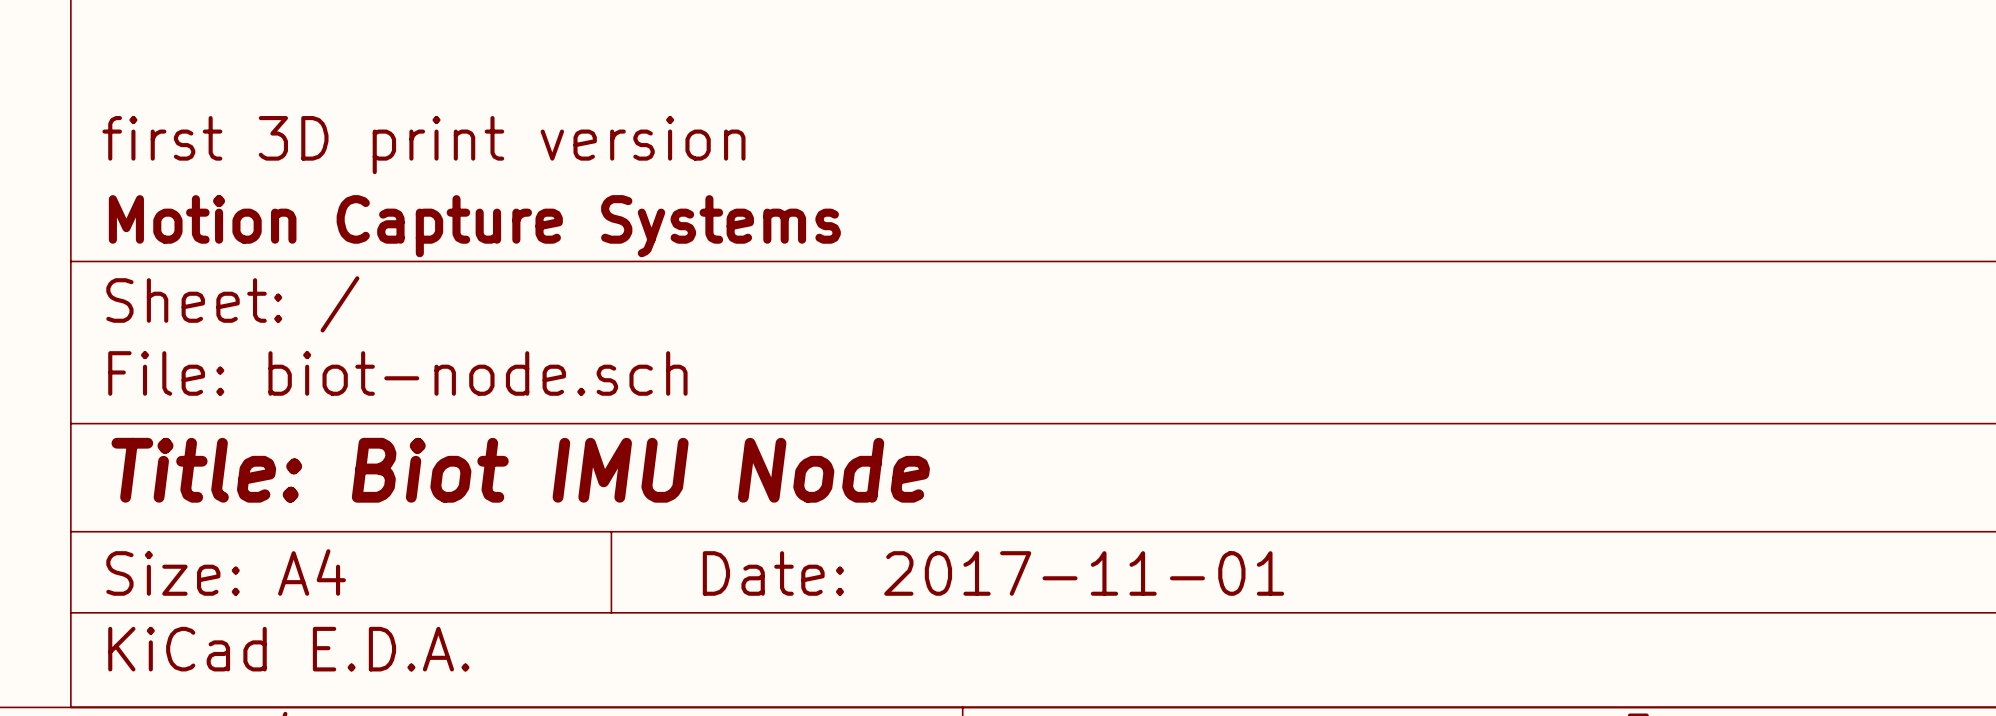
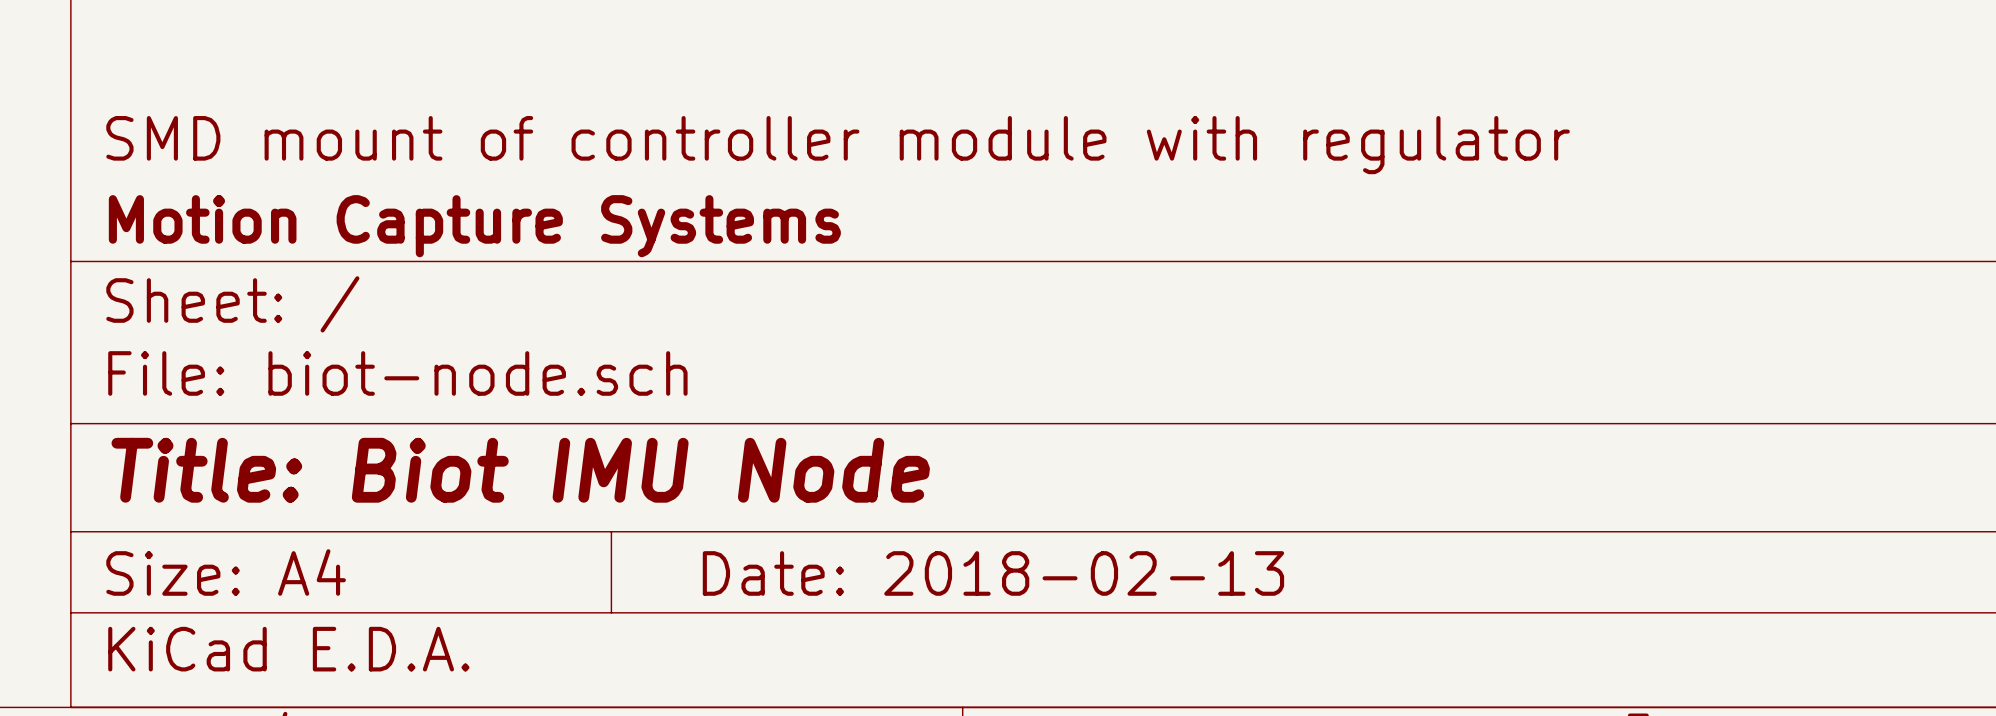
title block: first 3D print version (423, 145) -> SMD mount of controller module with regulator (838, 145)
title block: Date: 2017-11-01 (993, 573) -> Date: 2018-02-13 (993, 573)

